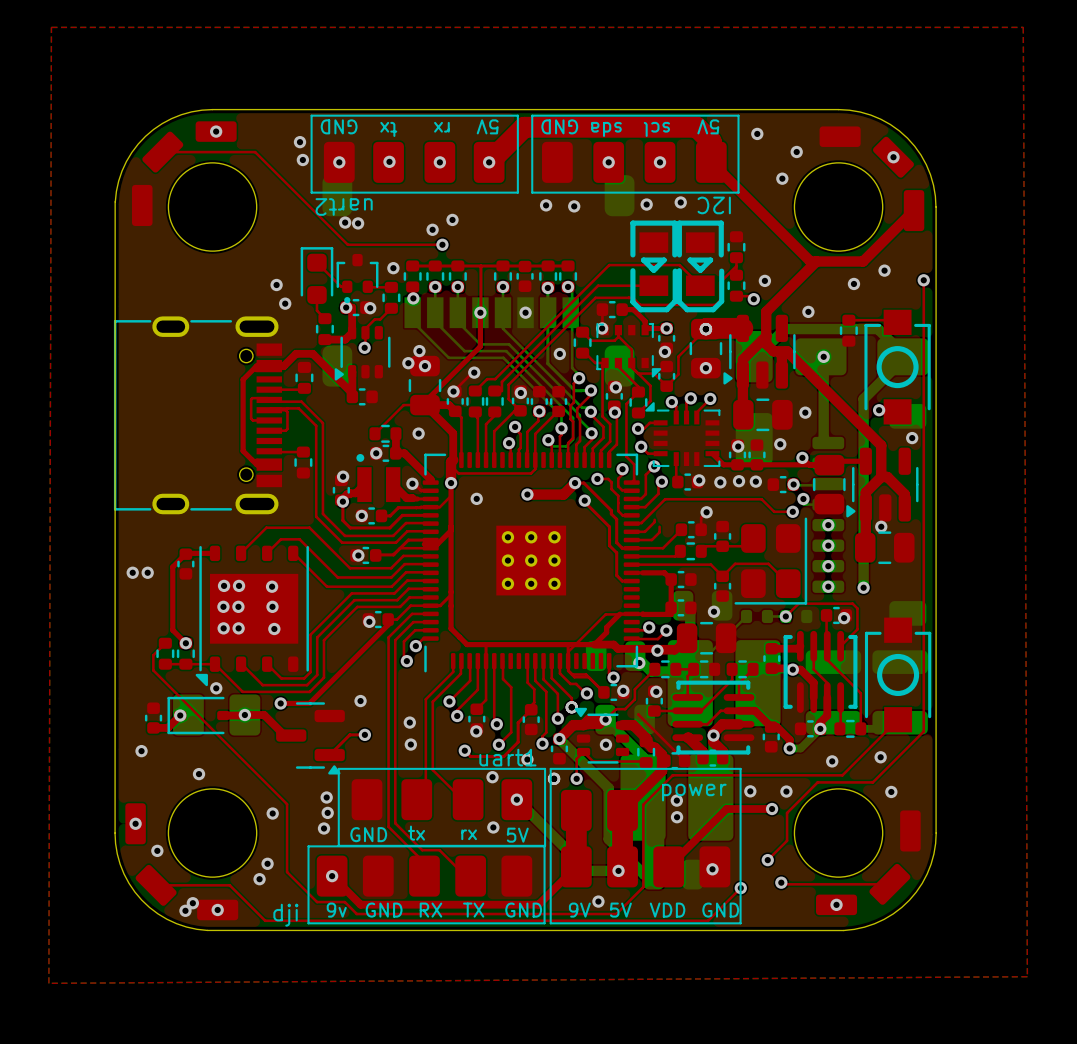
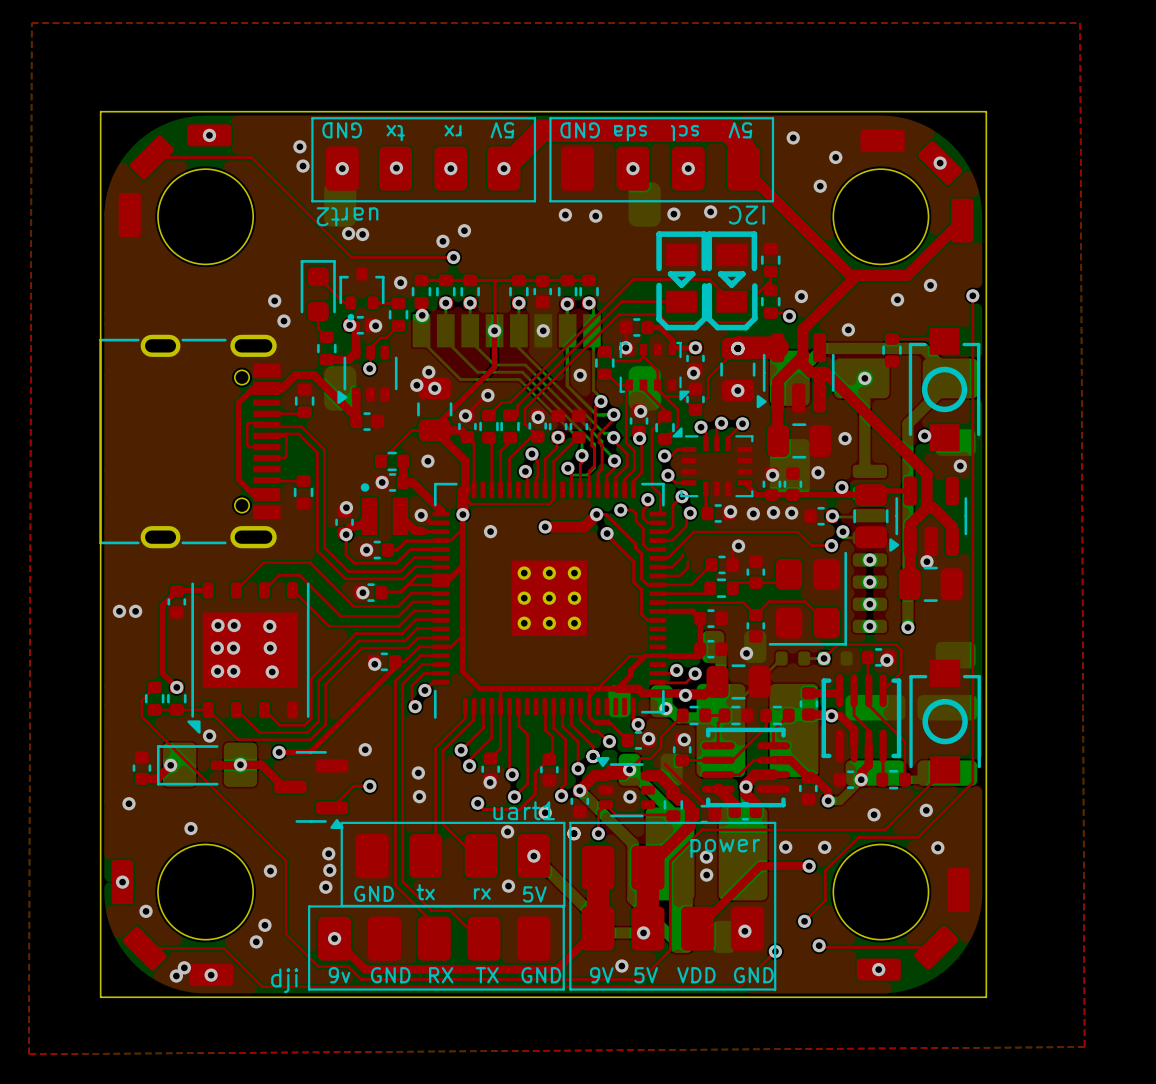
board edge: (212, 109) (191, 111) (171, 118) (145, 136) (126, 161) (118, 181) (115, 201) -> (205, 111) (100, 111) (100, 997) (986, 997) (986, 111) (880, 111)
board edge: (838, 109) (870, 115) (899, 130) (921, 155) (930, 174) (935, 196) (936, 833) -> none
board edge: (115, 201) (115, 833) (117, 854) (124, 874) (134, 892) (149, 907) (176, 923) (207, 930) (843, 930) (864, 927) (884, 919) (909, 900) (927, 874) (933, 854) (936, 833) -> none

